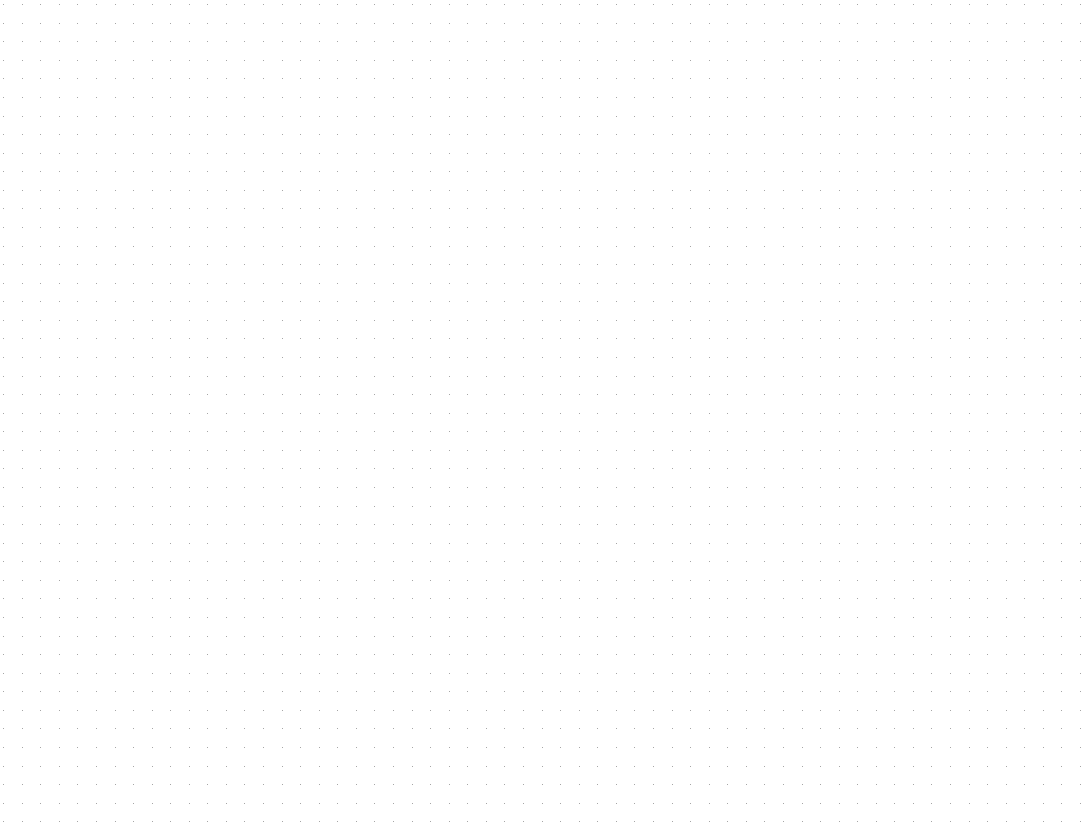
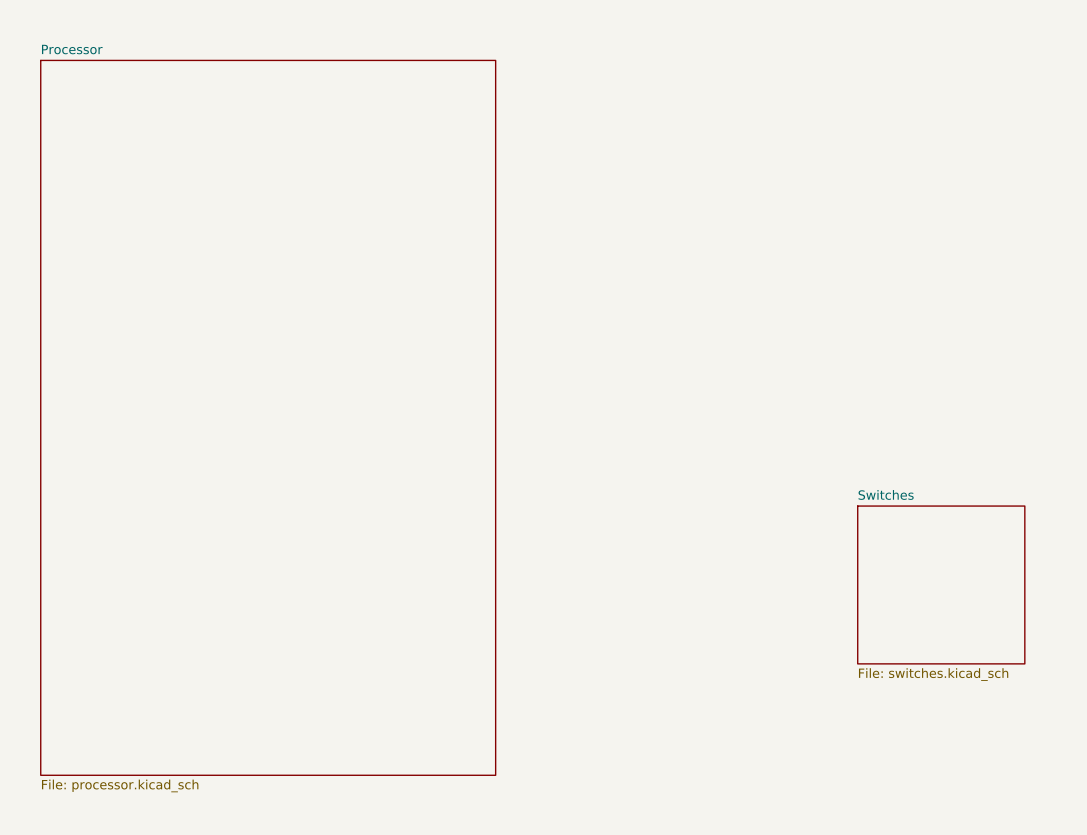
sheet Processor: none -> File: processor.kicad_sch (268, 417)
sheet Switches: none -> File: switches.kicad_sch (941, 584)

